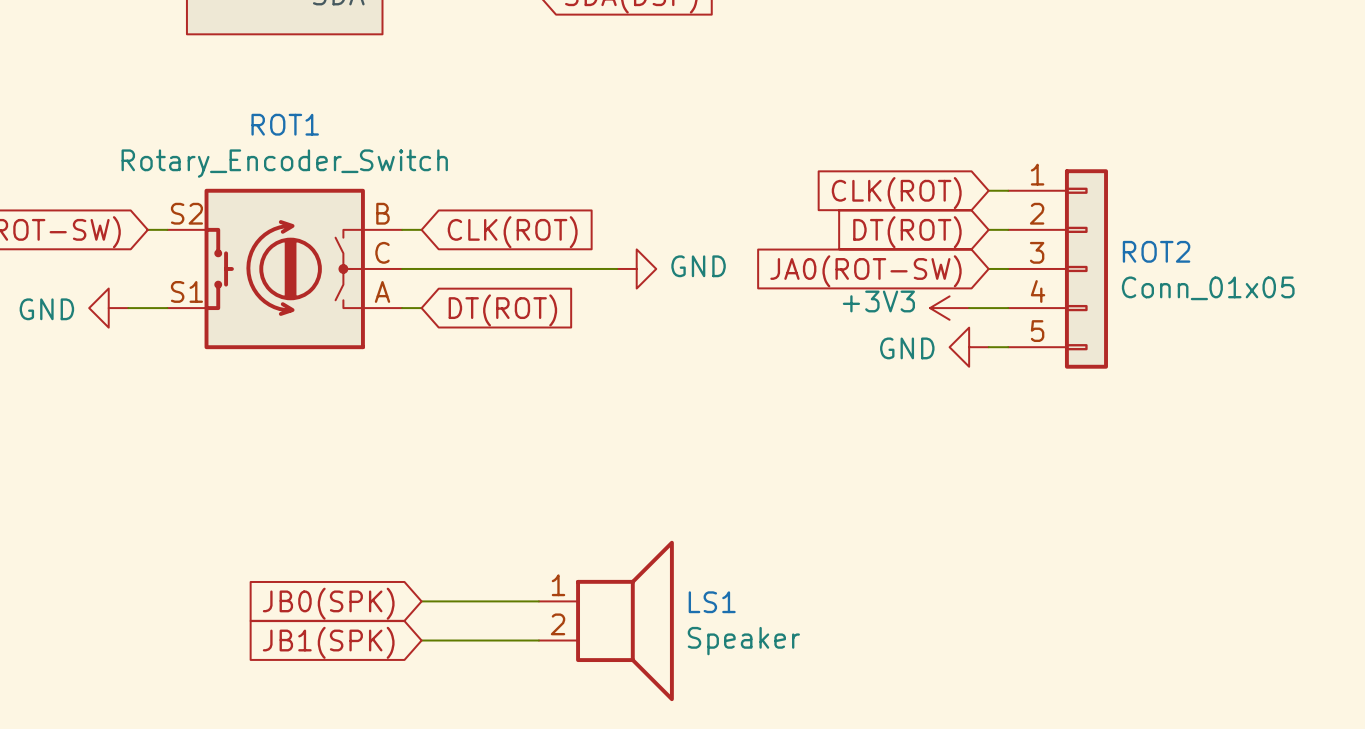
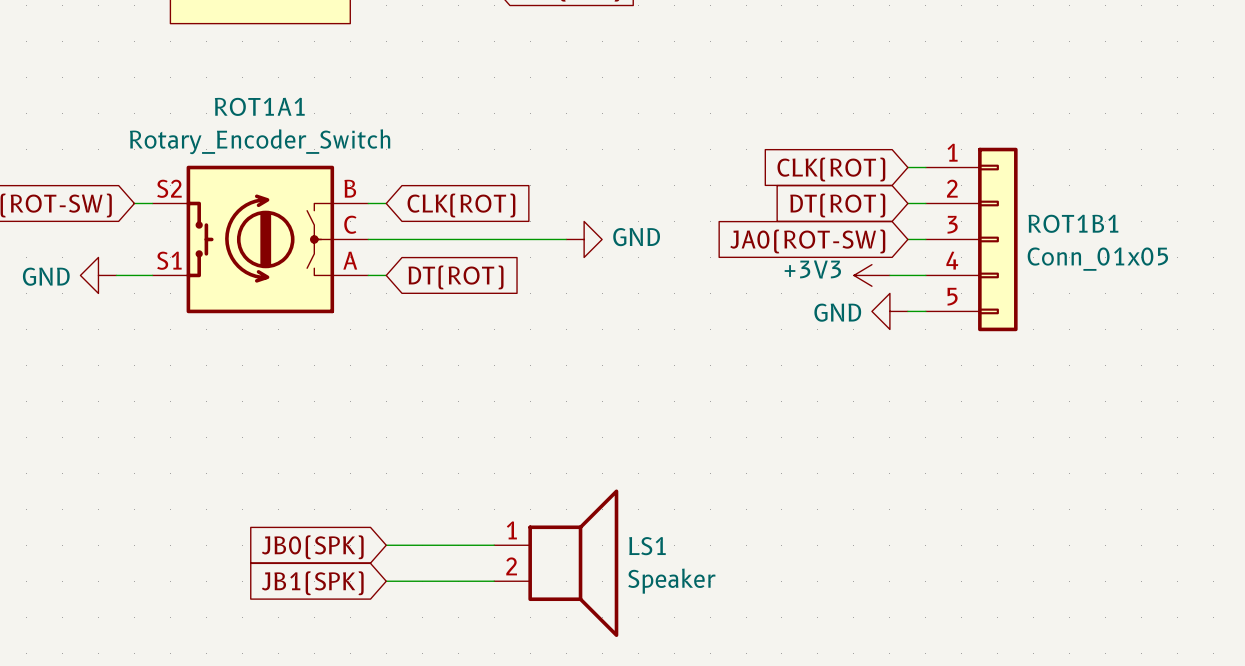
ROT1 name: ROT1 (285, 124) -> ROT1A1 (259, 106)
ROT2 name: ROT2 (1156, 251) -> ROT1B1 (1073, 223)

